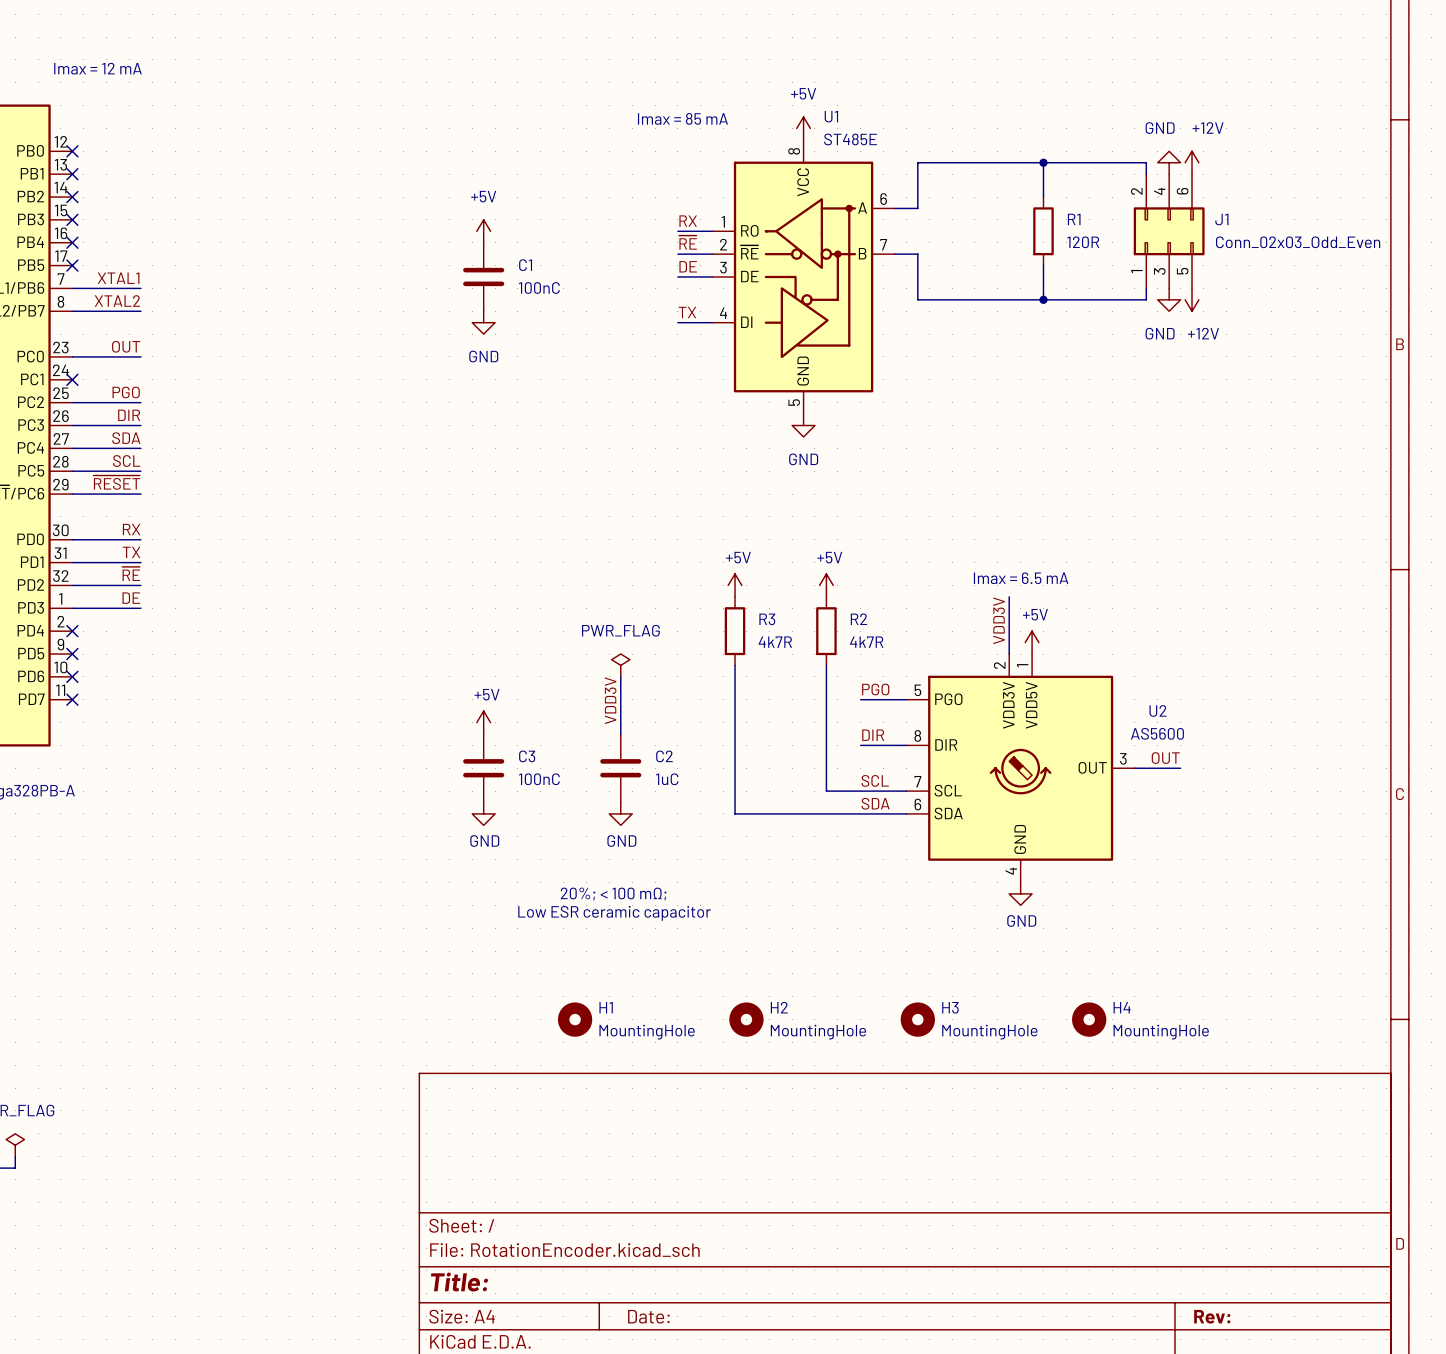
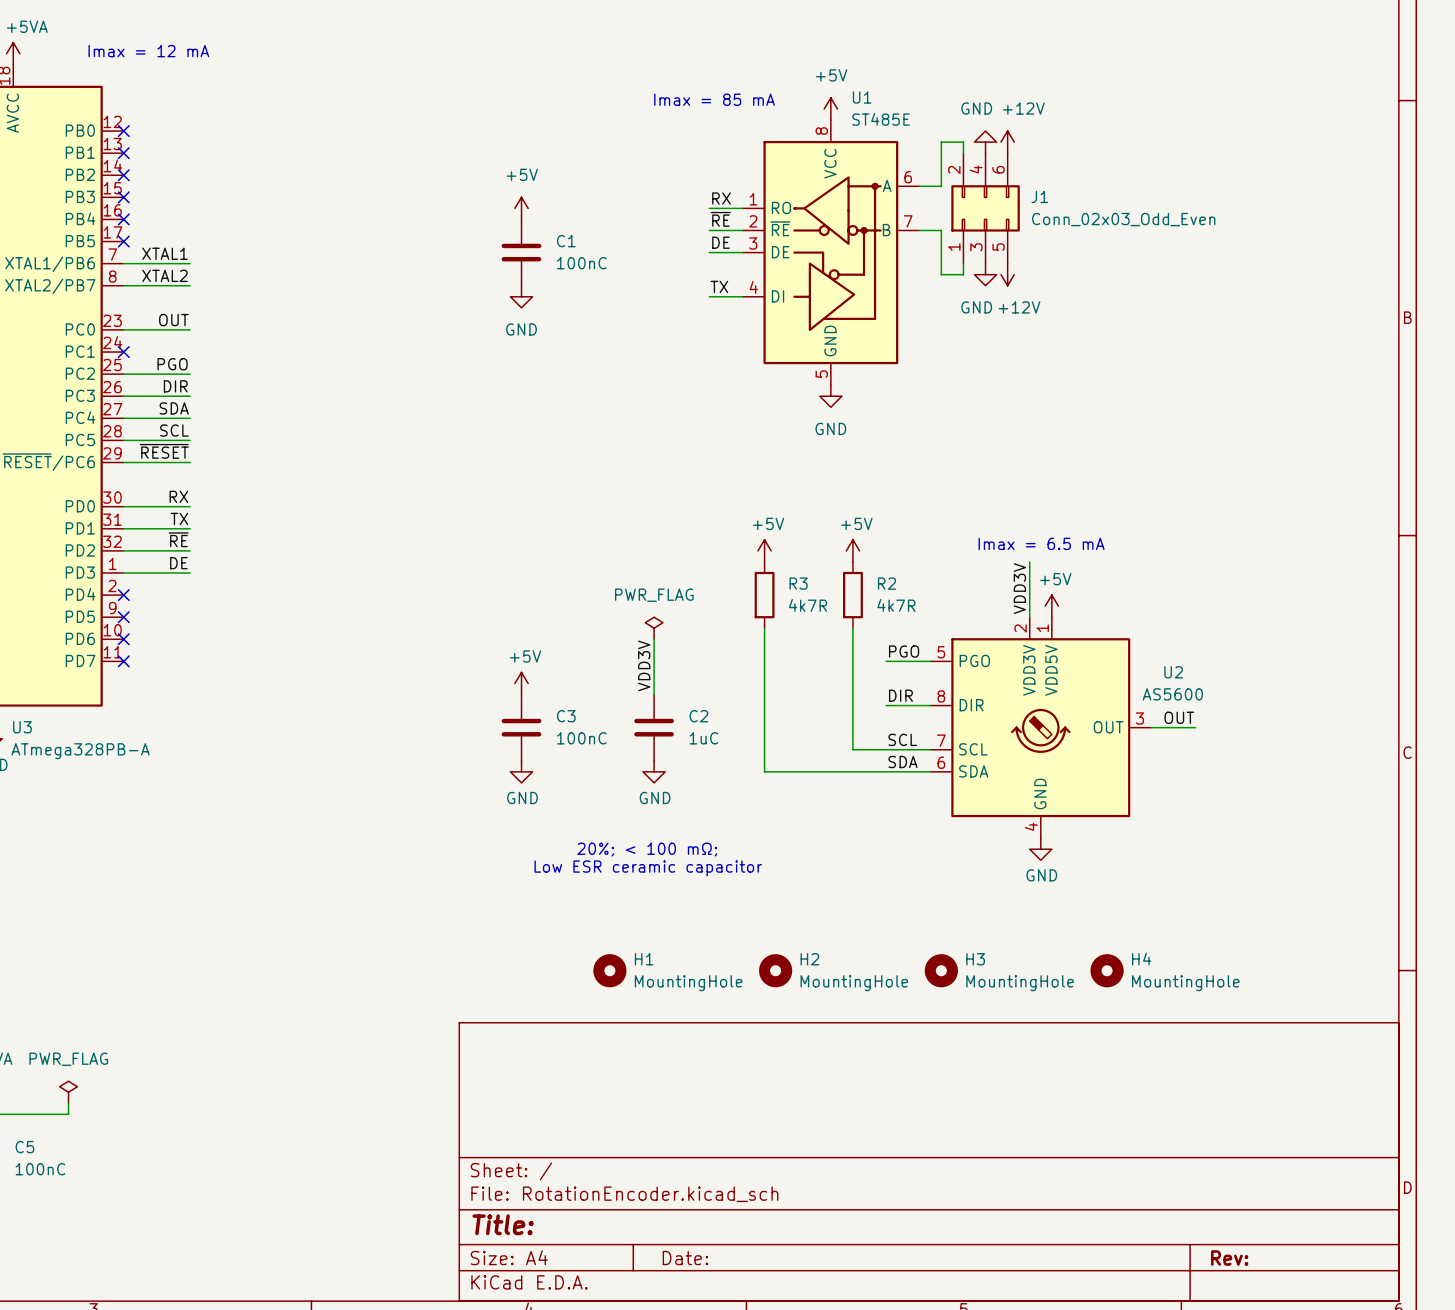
wire: (940, 162) (1146, 162) (1146, 174) -> (963, 142) (963, 153)
power symbol: none -> GND (985, 142)
power symbol: none -> +12V (1007, 142)
wire: (1043, 162) (1043, 197) -> none
junction: (1043, 162) -> none
power symbol: GND (1169, 162) -> none
power symbol: +12V (1192, 162) -> none
R1: 120R (1043, 231) -> none
J1 position: (1169, 231) -> (985, 208)
wire: (1043, 265) (1043, 299) -> none
wire: (1146, 288) (1146, 299) (940, 299) -> (963, 263) (963, 274)
power symbol: none -> GND (985, 274)
power symbol: none -> +12V (1007, 274)
junction: (1043, 299) -> none
power symbol: GND (1169, 299) -> none
power symbol: +12V (1192, 299) -> none

